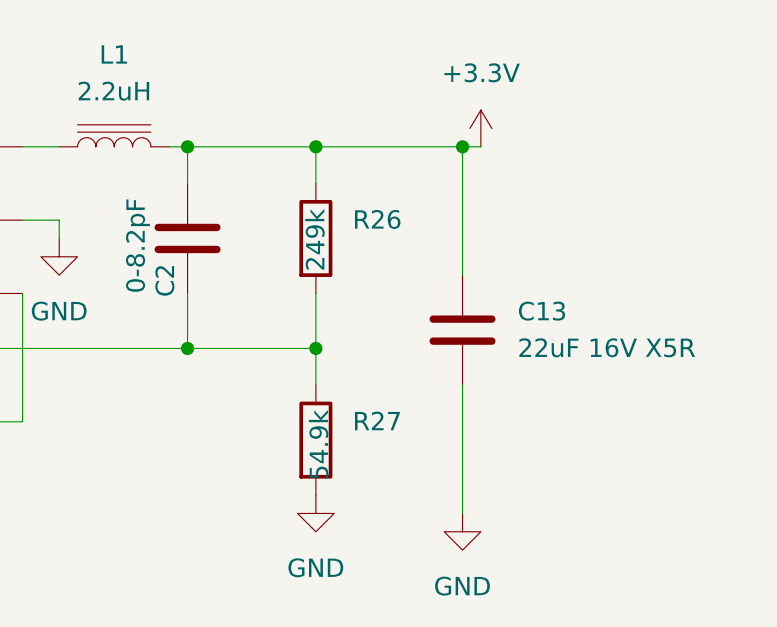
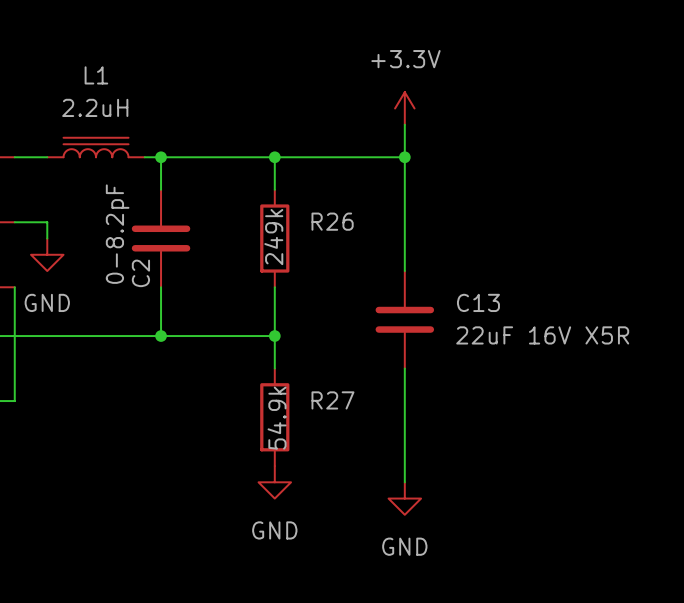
power symbol position: +3.3V (480, 128) -> +3.3V (404, 108)
wire: (462, 146) (480, 146) -> (404, 157) (404, 124)

